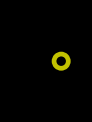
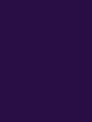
part: (61, 61) -> none

